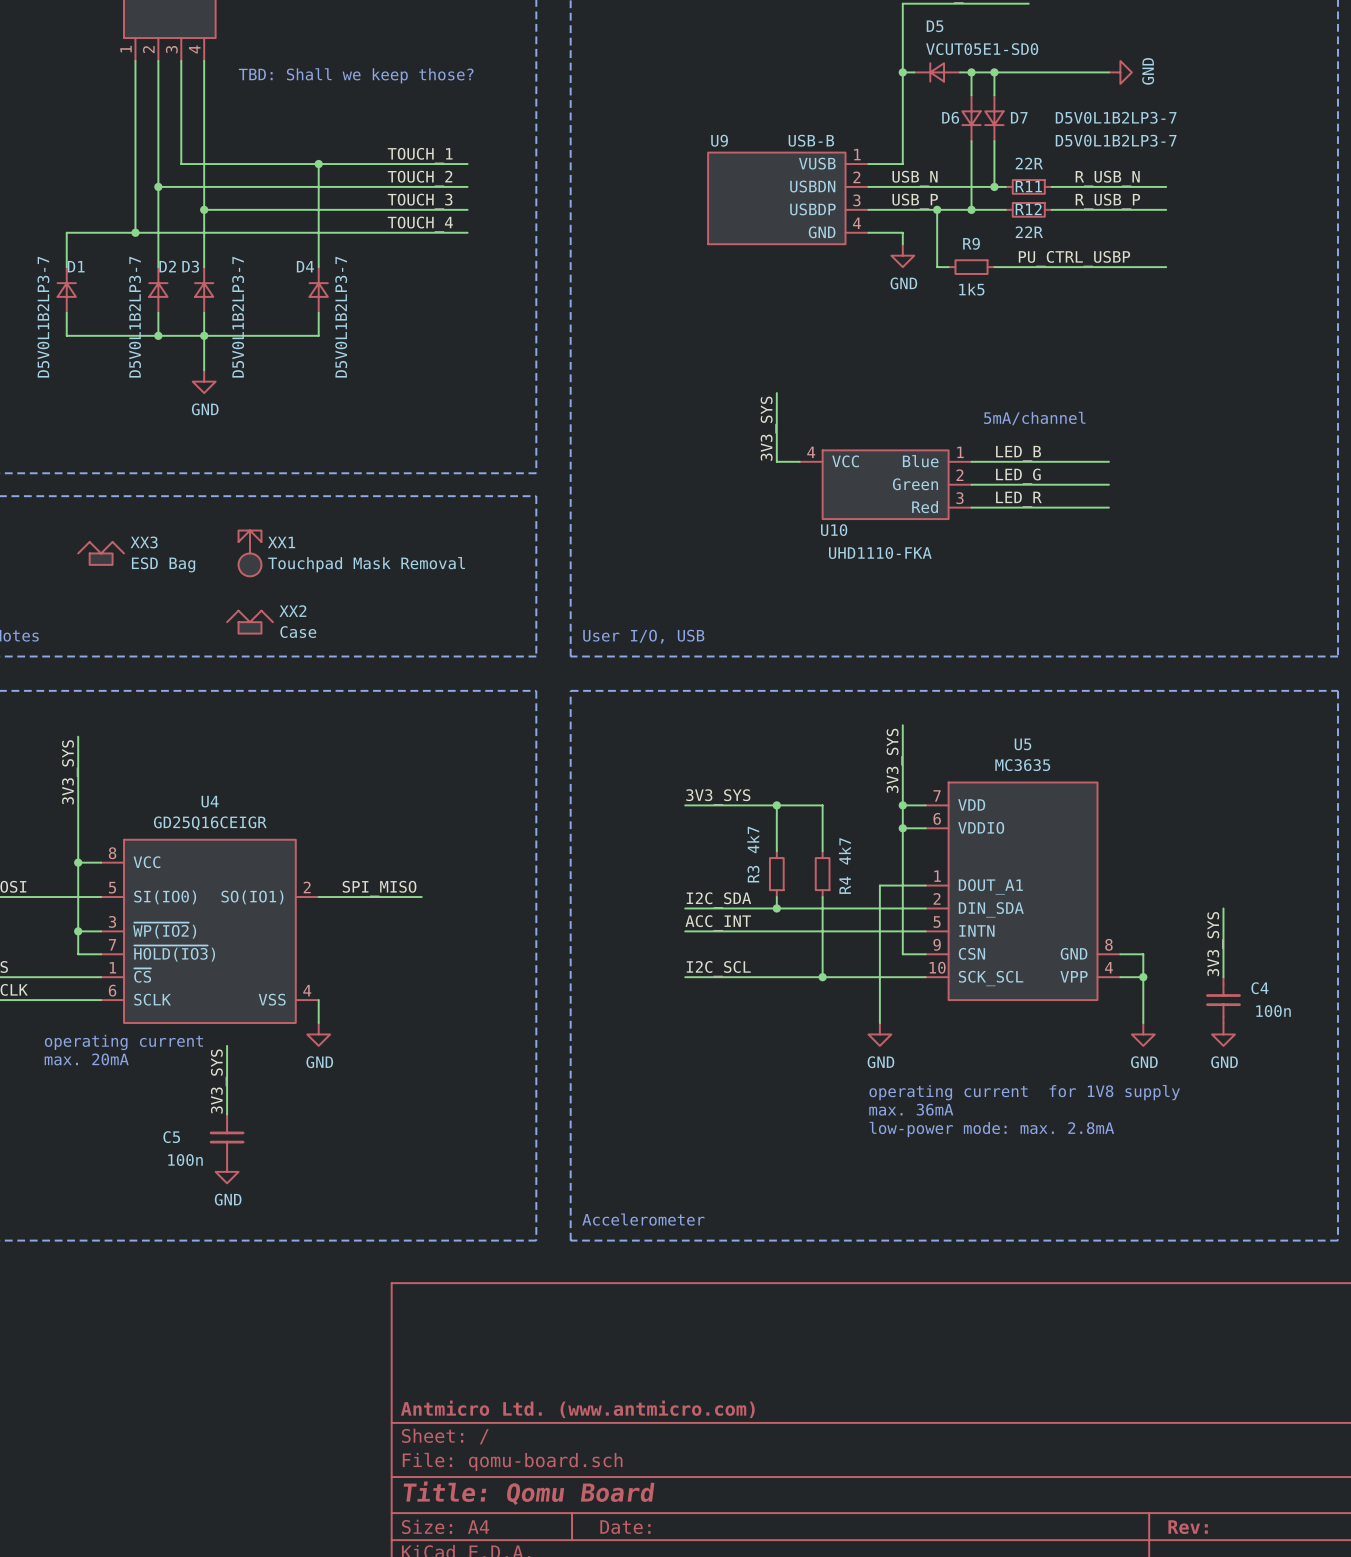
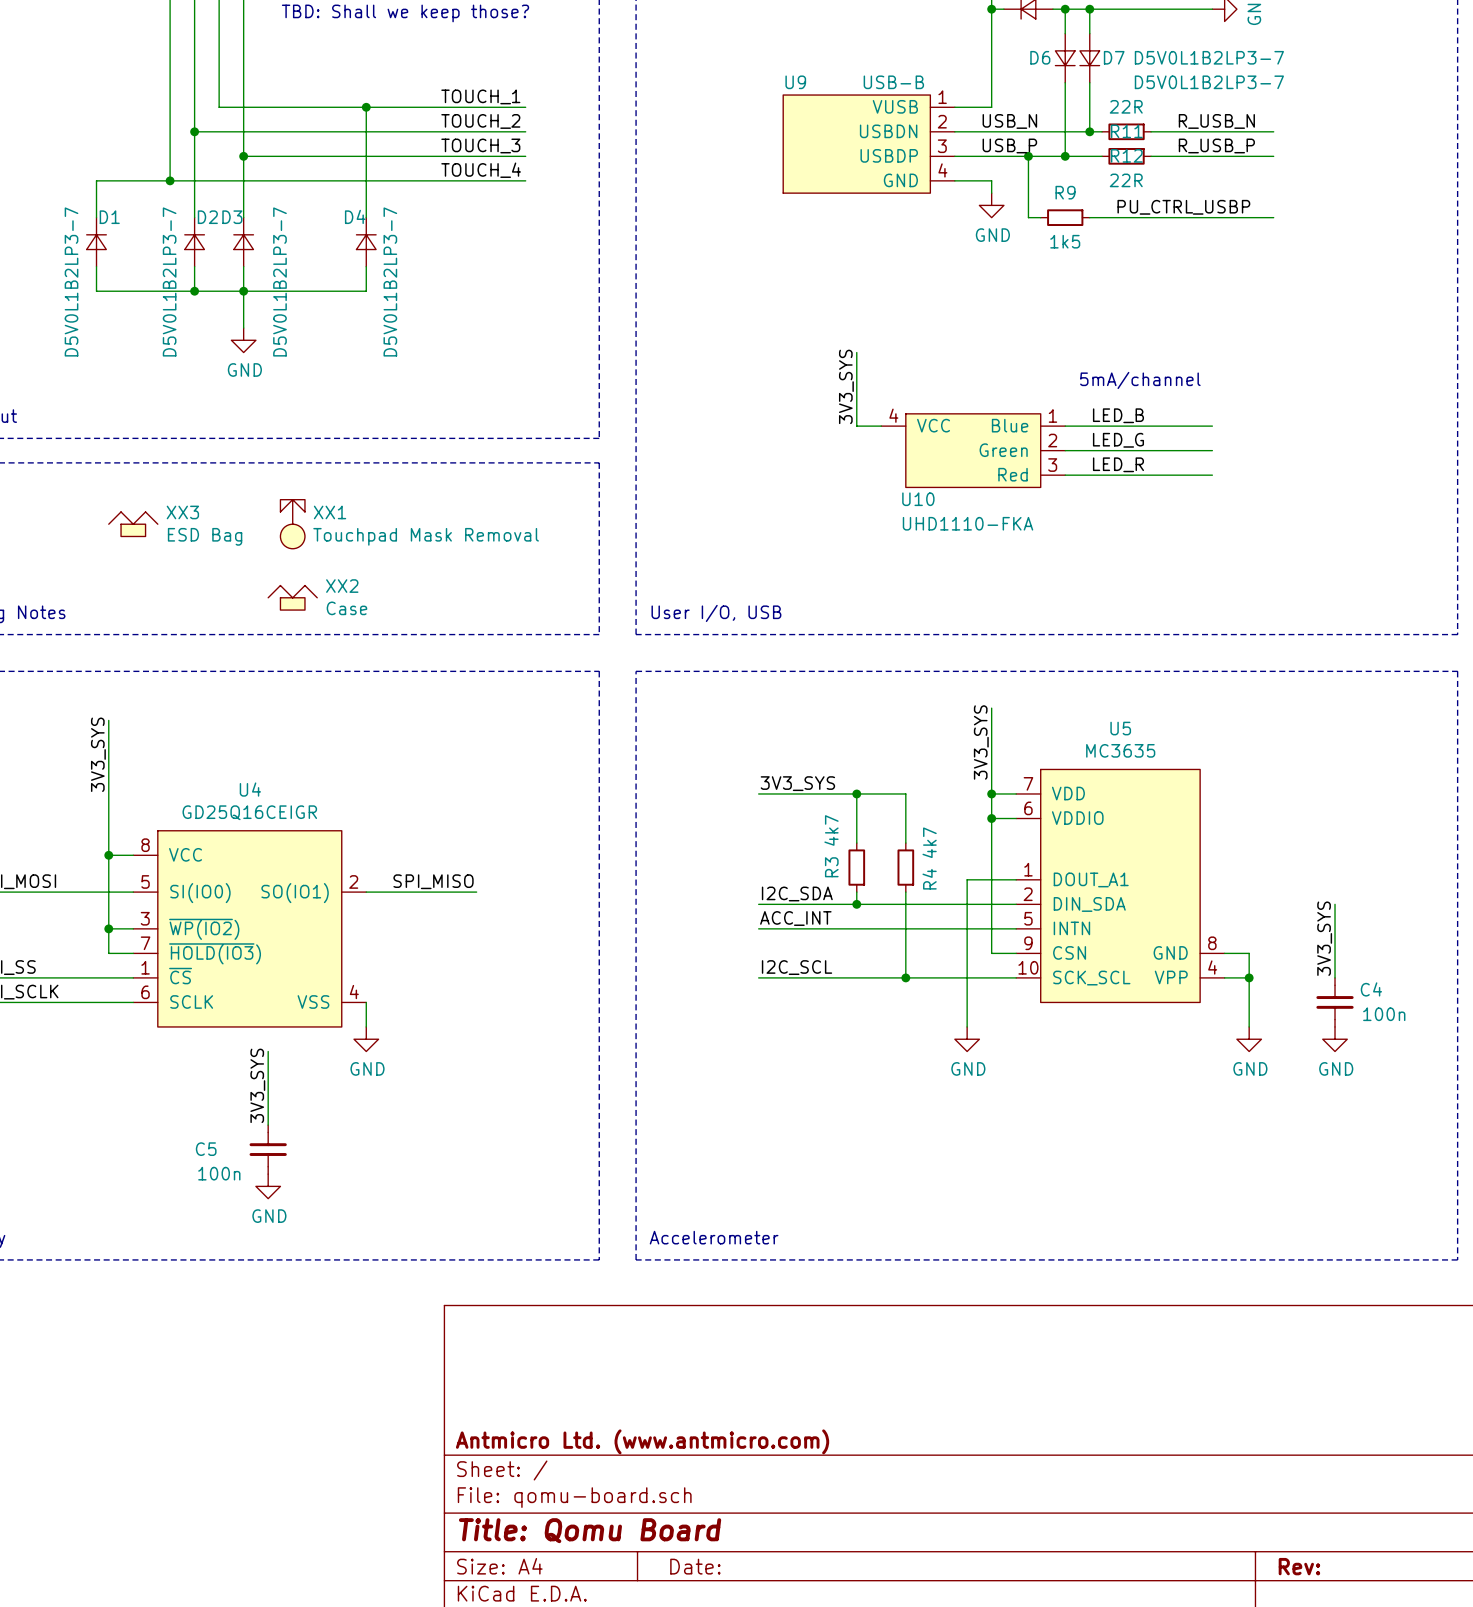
text: operating current (123, 1042) -> none
text: max. 20mA (86, 1059) -> none
text: operating current for 1V8 supply (1024, 1092) -> none
text: max. 36mA (911, 1109) -> none
text: low-power mode: max. 2.8mA (991, 1129) -> none

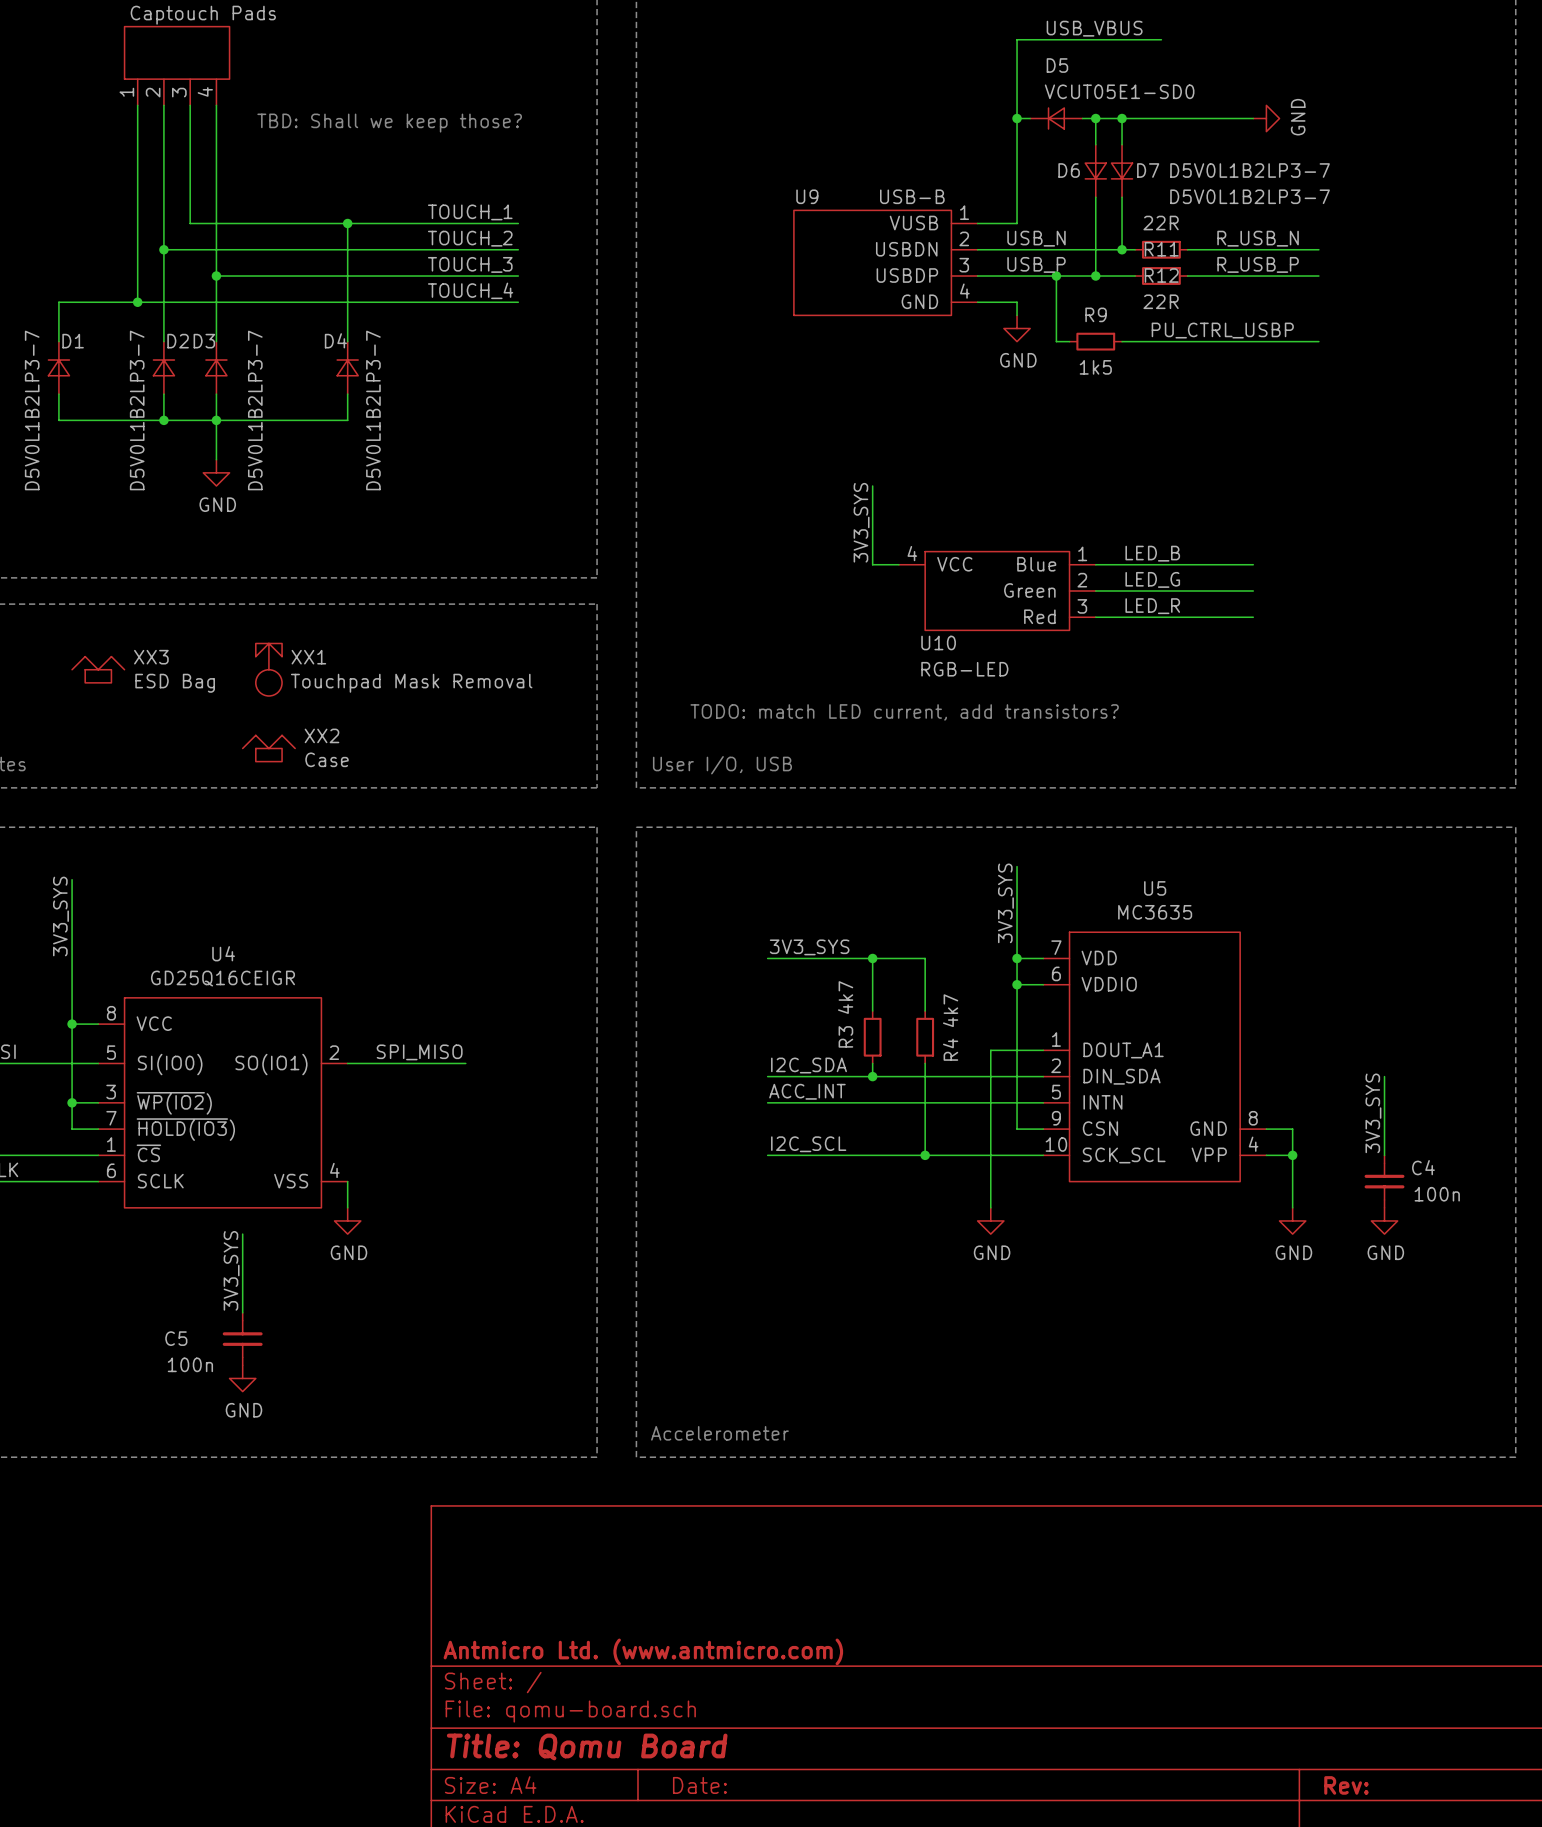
text: 5mA/channel (1140, 380) -> none
U10 value: UHD1110-FKA (968, 523) -> RGB-LED (964, 669)
text: none -> TODO: match LED current, add transistors? (904, 712)

